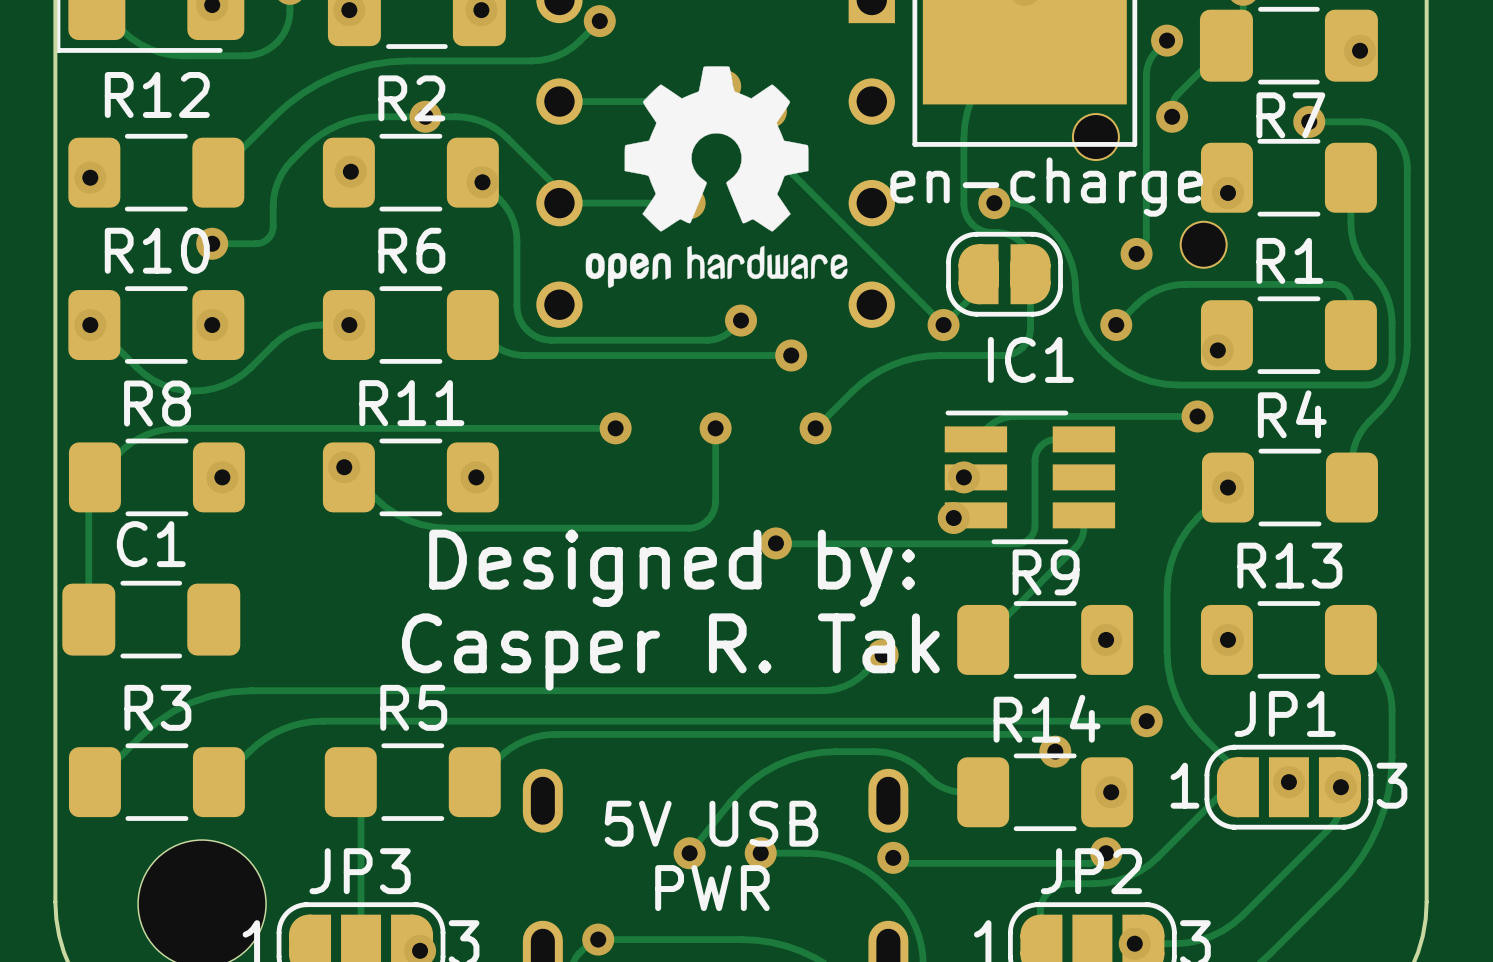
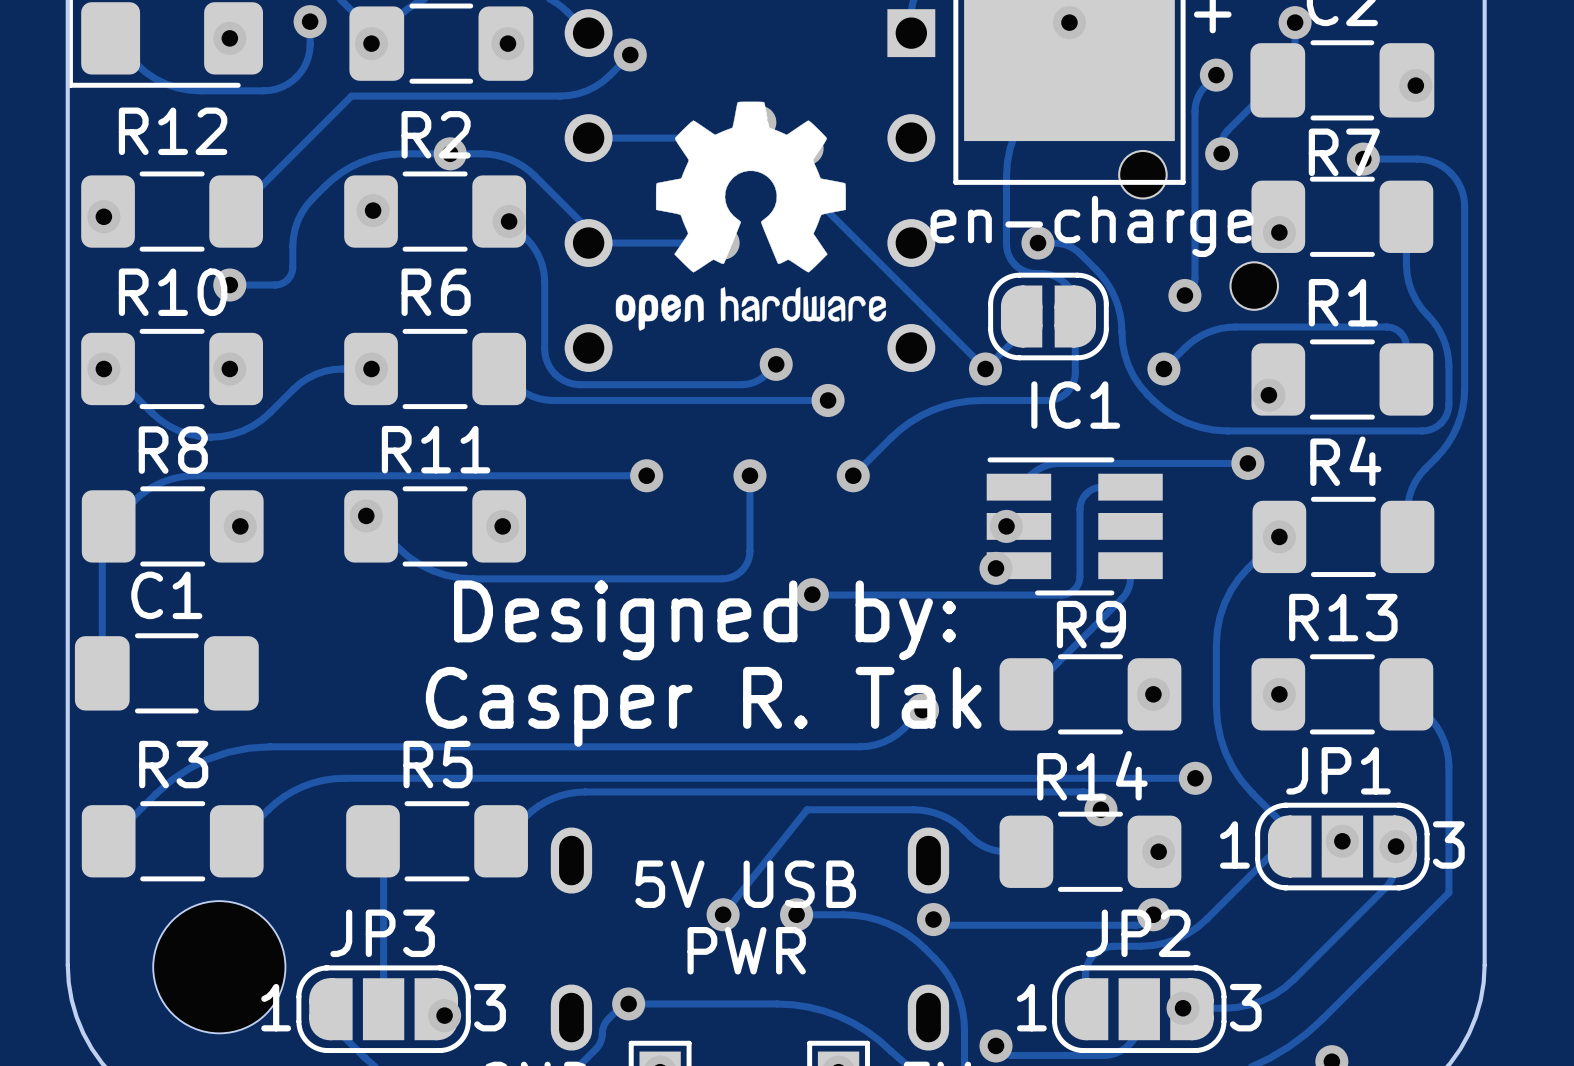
track: (409, 60) (371, 64) (336, 75) (303, 93) (274, 116) -> (433, 96) (351, 96) (293, 153)
track: (835, 751) (805, 755) (777, 765) (751, 781) (730, 802) -> (874, 809) (807, 809) (765, 862)
track: (1392, 756) (1388, 792) (1378, 826) (1361, 857) (1338, 885) -> (1448, 814) (1448, 892) (1393, 947)

